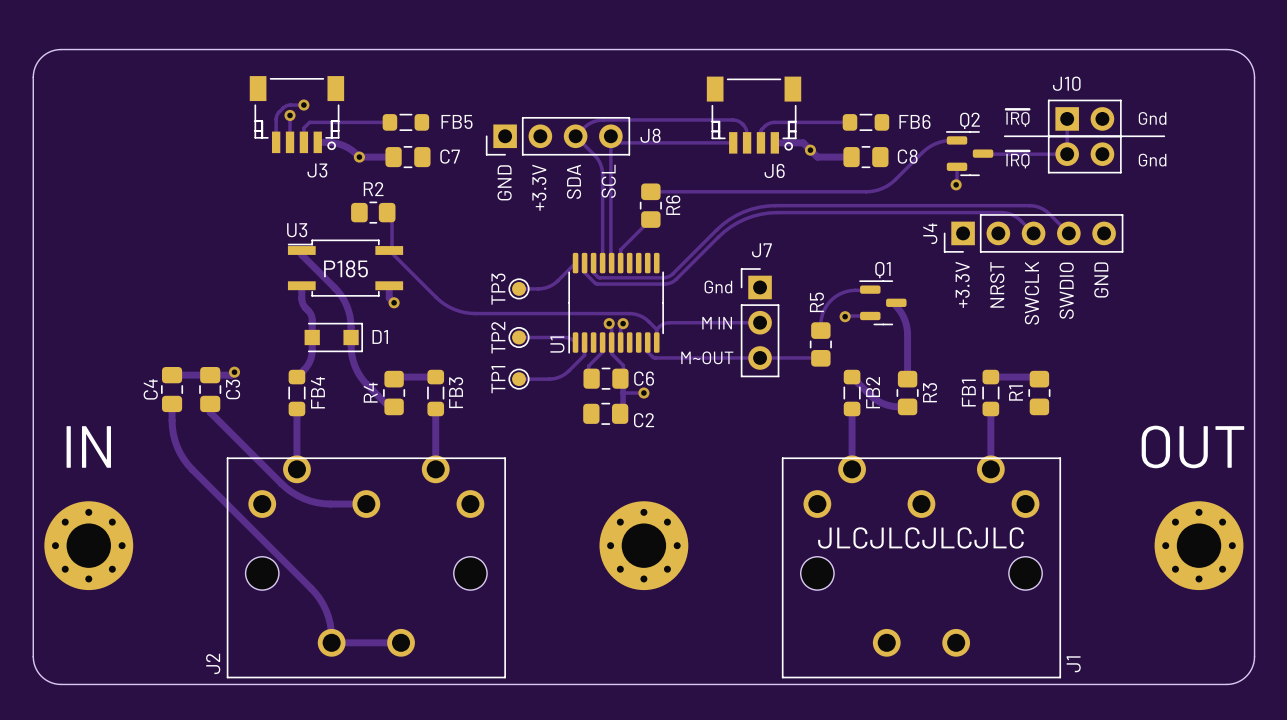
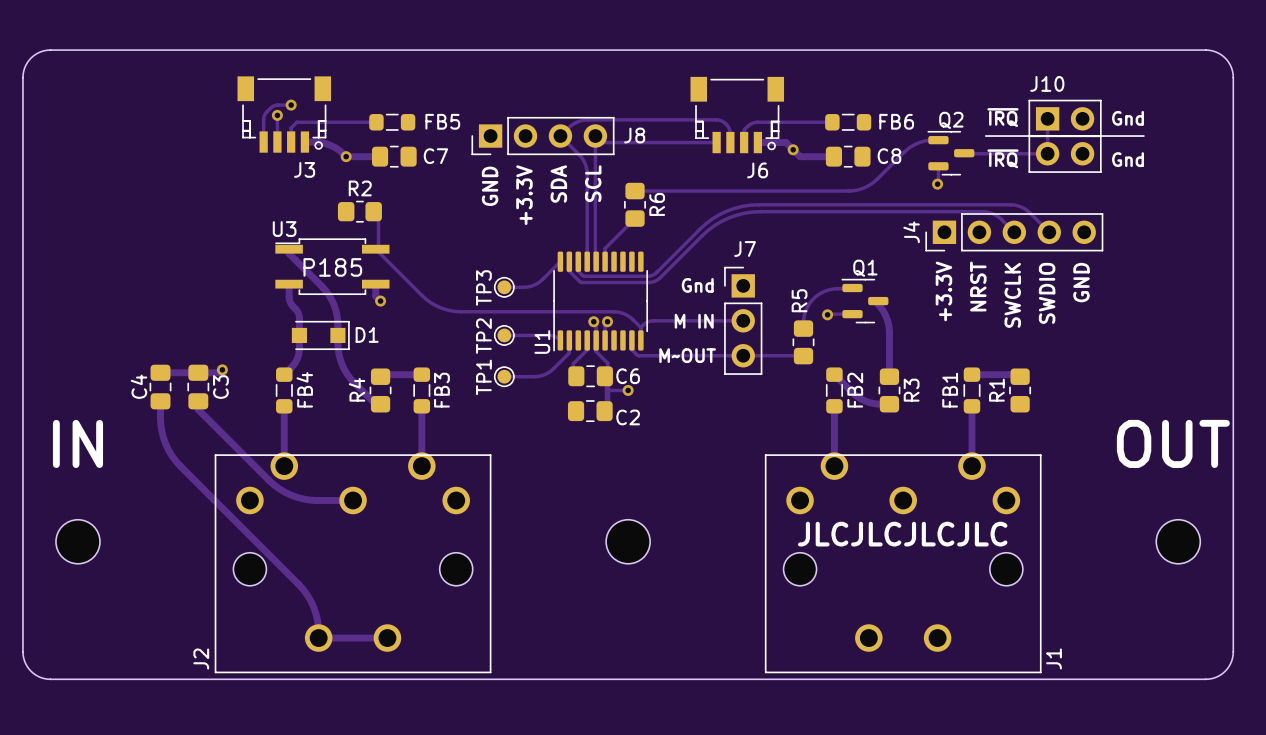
part footprint: [44, 501, 134, 591] -> [55, 519, 100, 564]
part footprint: [599, 501, 689, 591] -> [606, 519, 651, 564]
part footprint: [1154, 501, 1244, 591] -> [1156, 519, 1201, 564]

